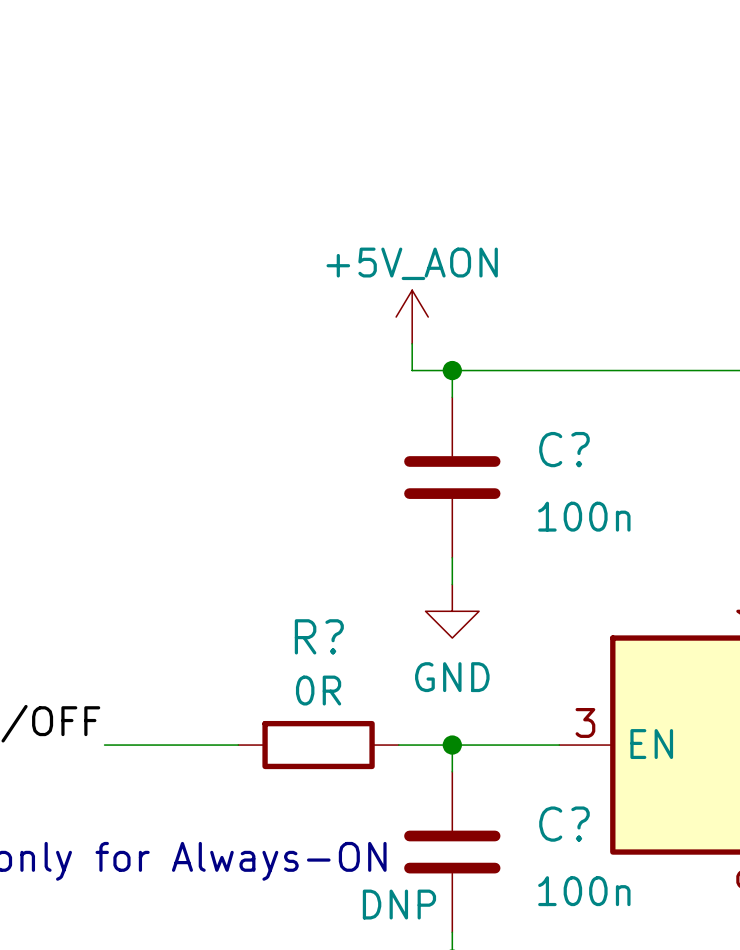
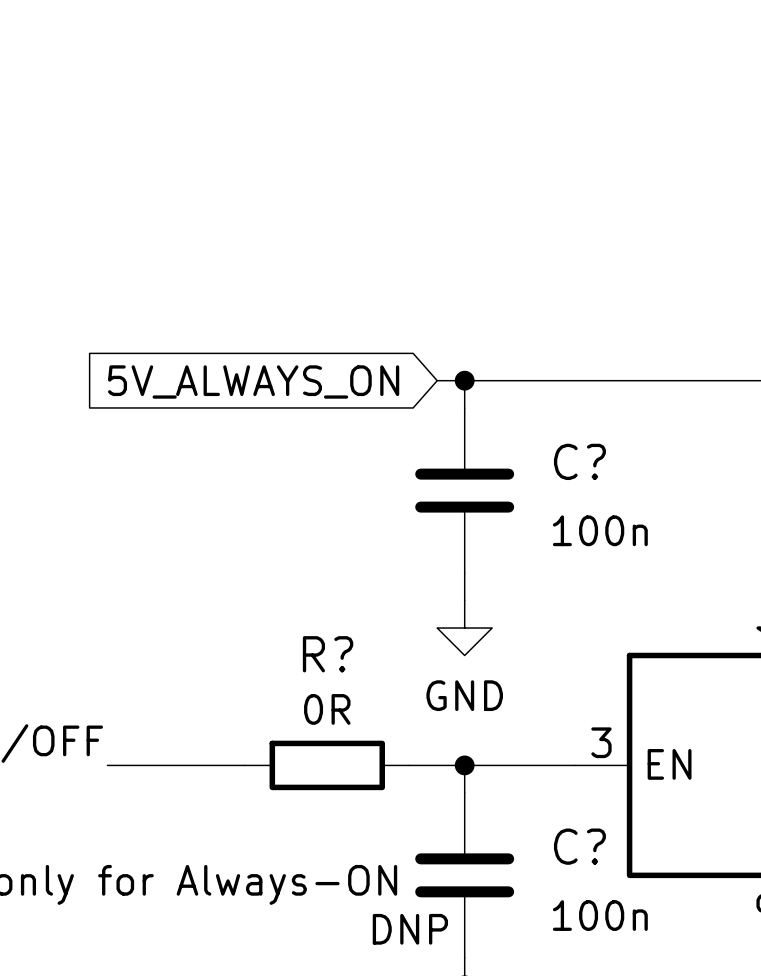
power symbol: +5V_AON (412, 317) -> none
wire: (412, 343) (412, 370) (425, 370) -> none
global label: none -> 5V_ALWAYS_ON (253, 381)

